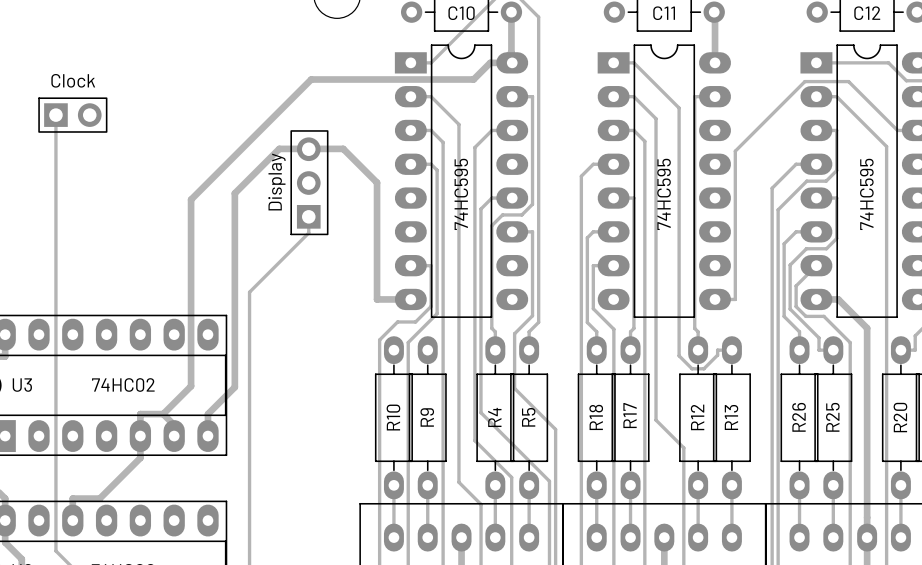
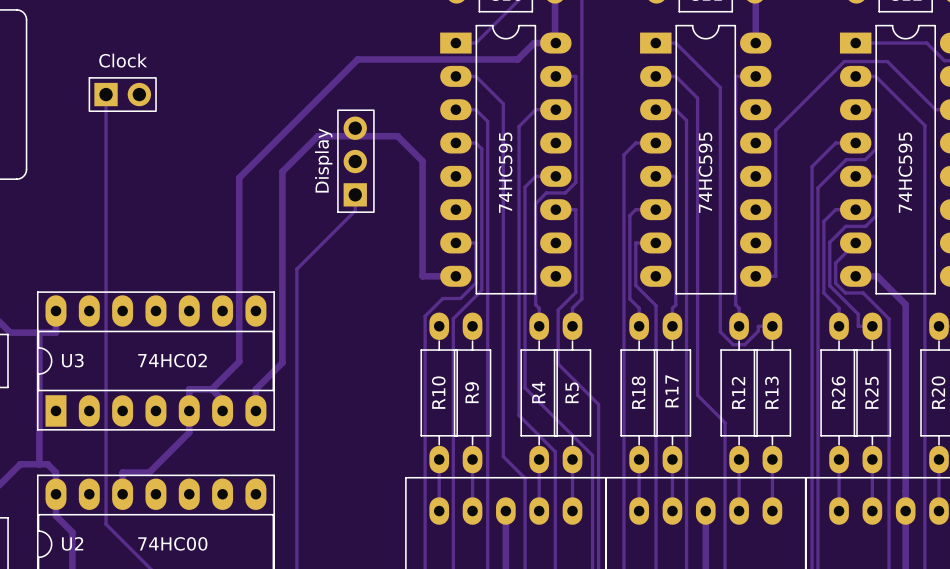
track: (309, 148) (343, 148) (351, 157) -> (317, 136) (397, 136)
track: (270, 157) (279, 148) (299, 148) (308, 157) -> none

